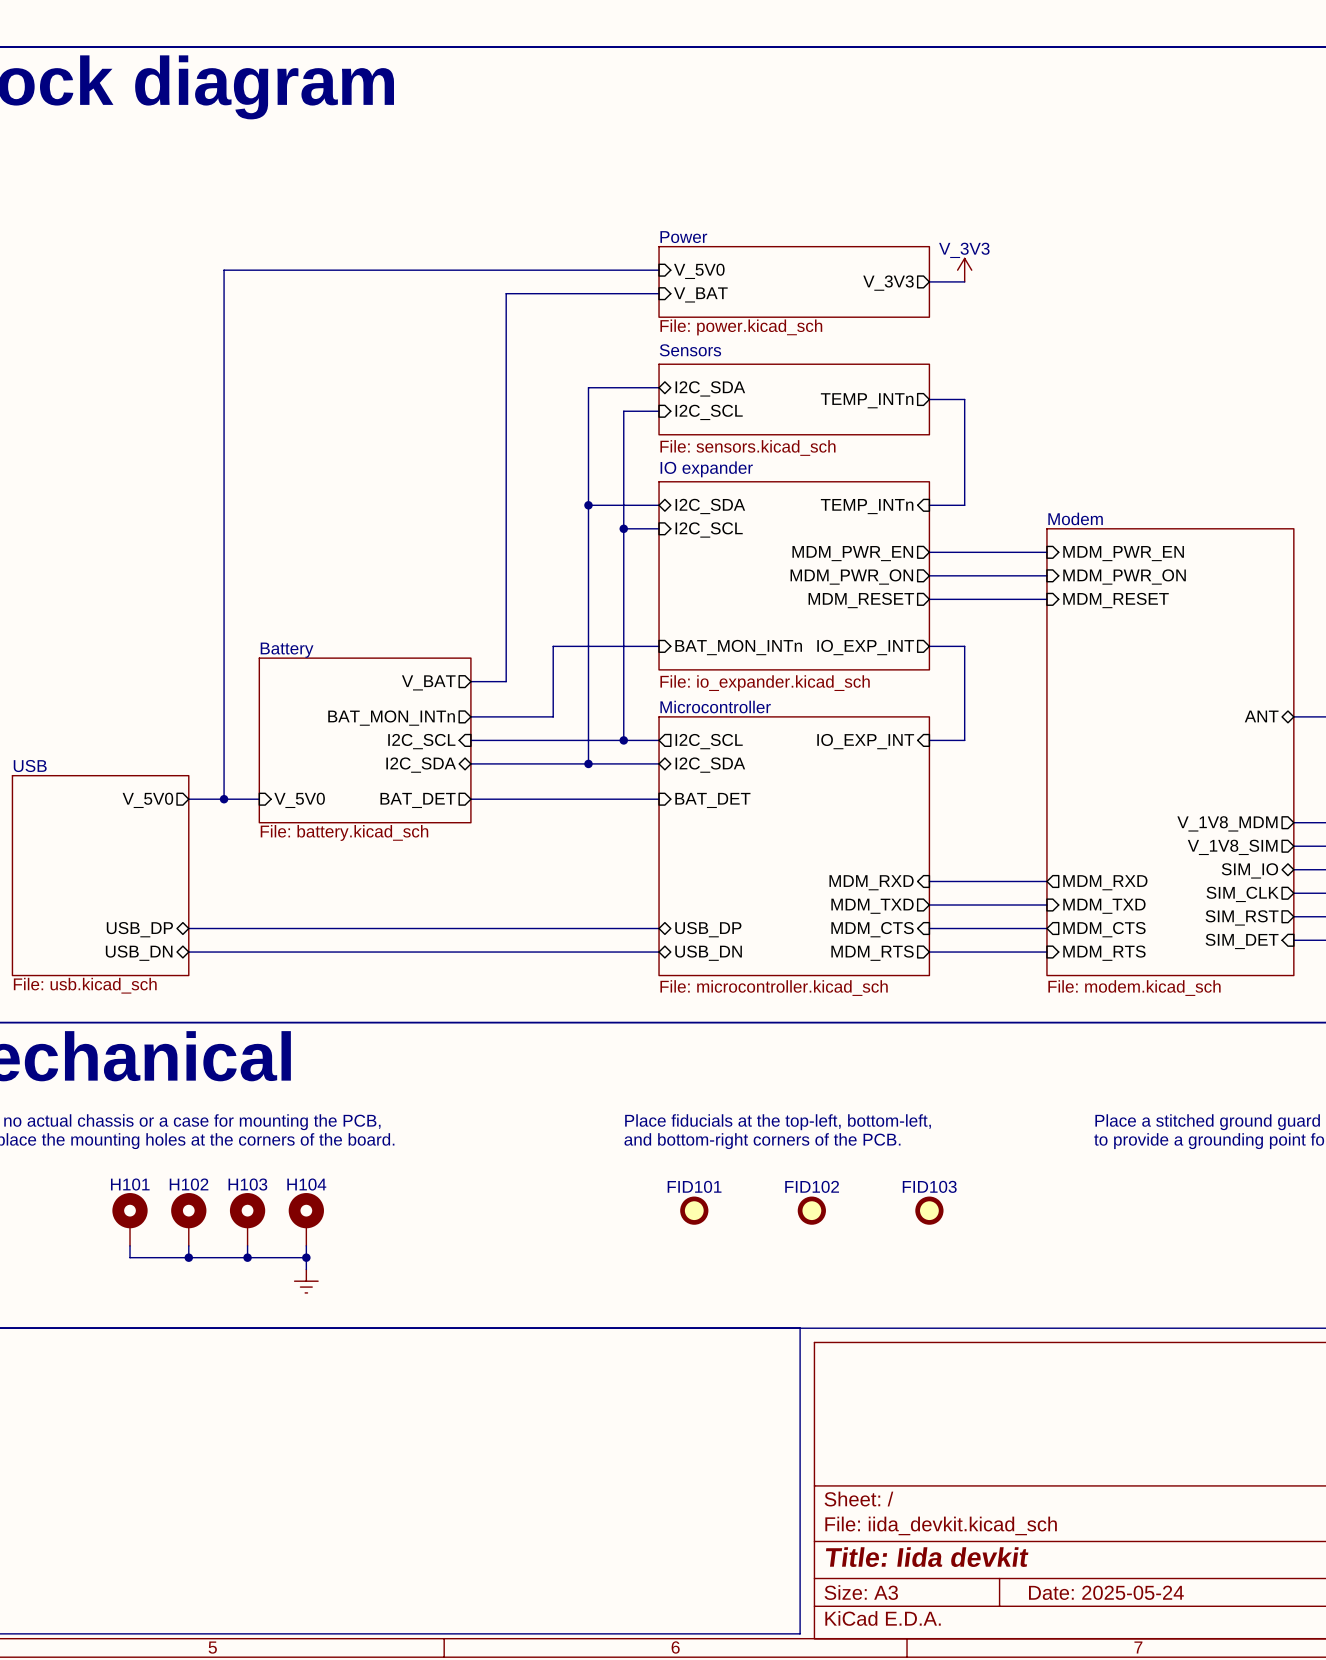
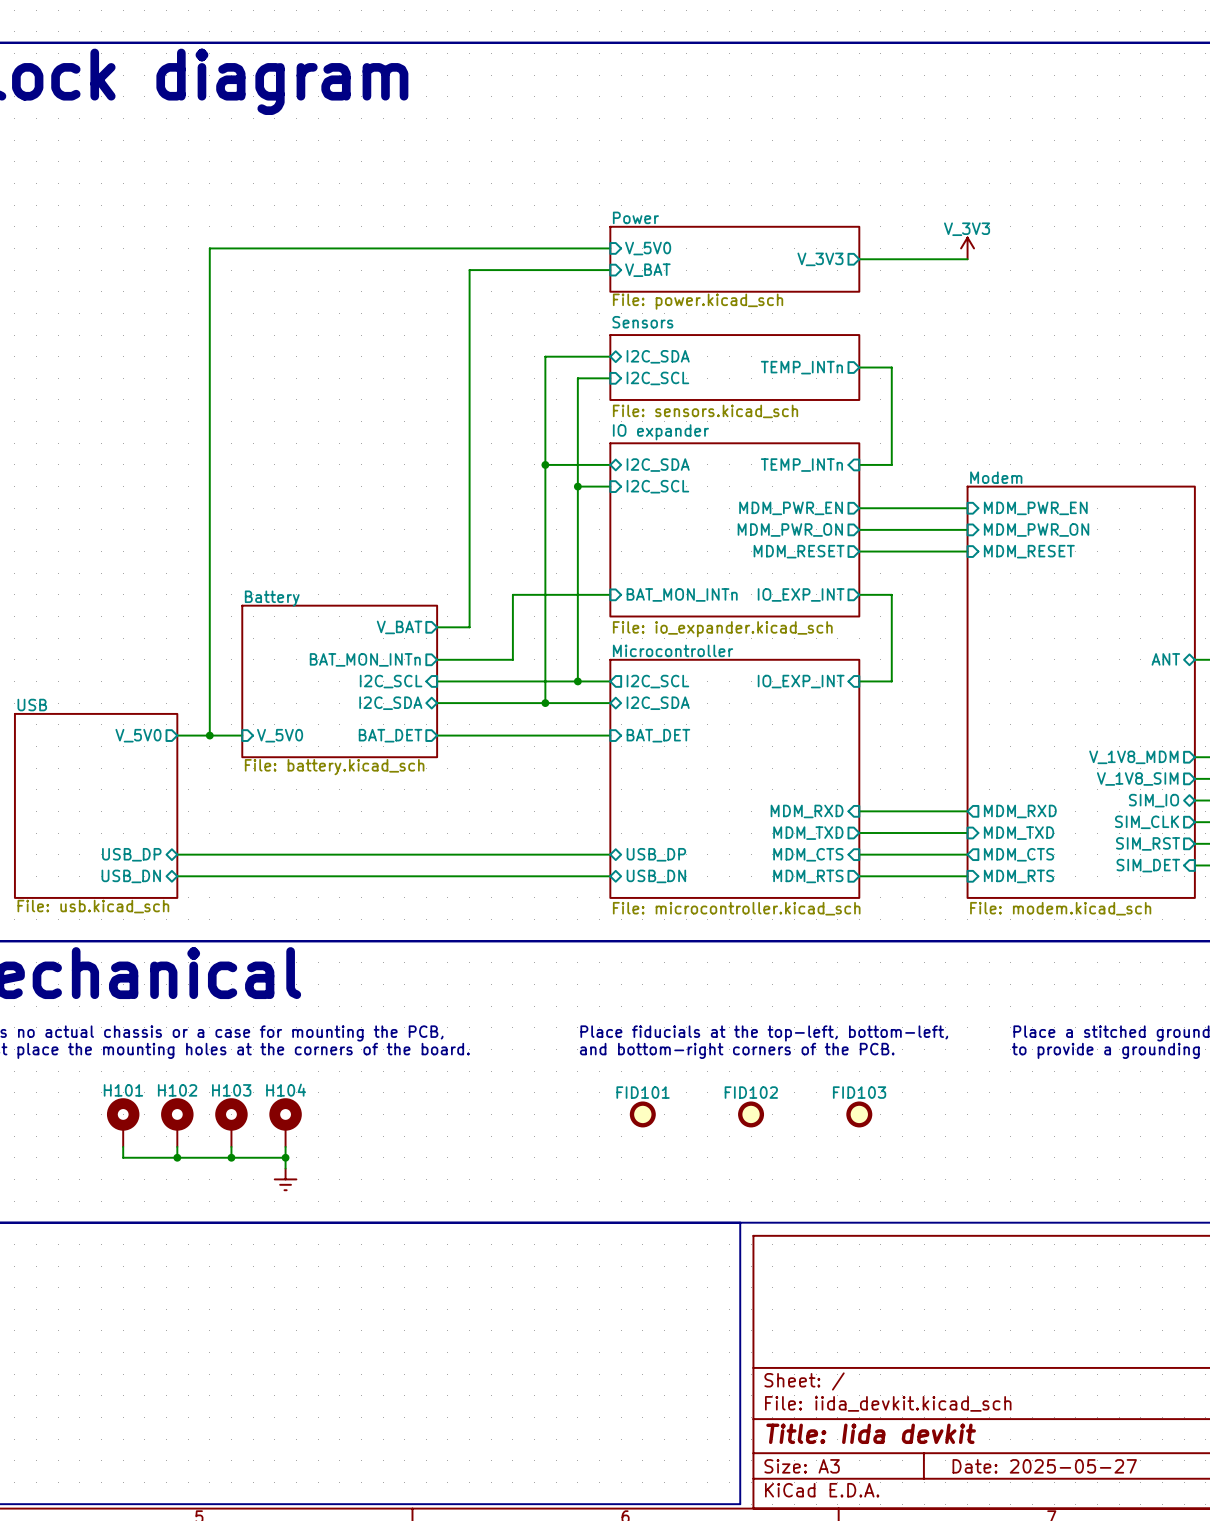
power symbol position: V_3V3 (964, 270) -> V_3V3 (967, 248)
wire: none -> (891, 259) (967, 259)
title block: Date: 2025-05-24 (1106, 1592) -> Date: 2025-05-27 (1044, 1466)

